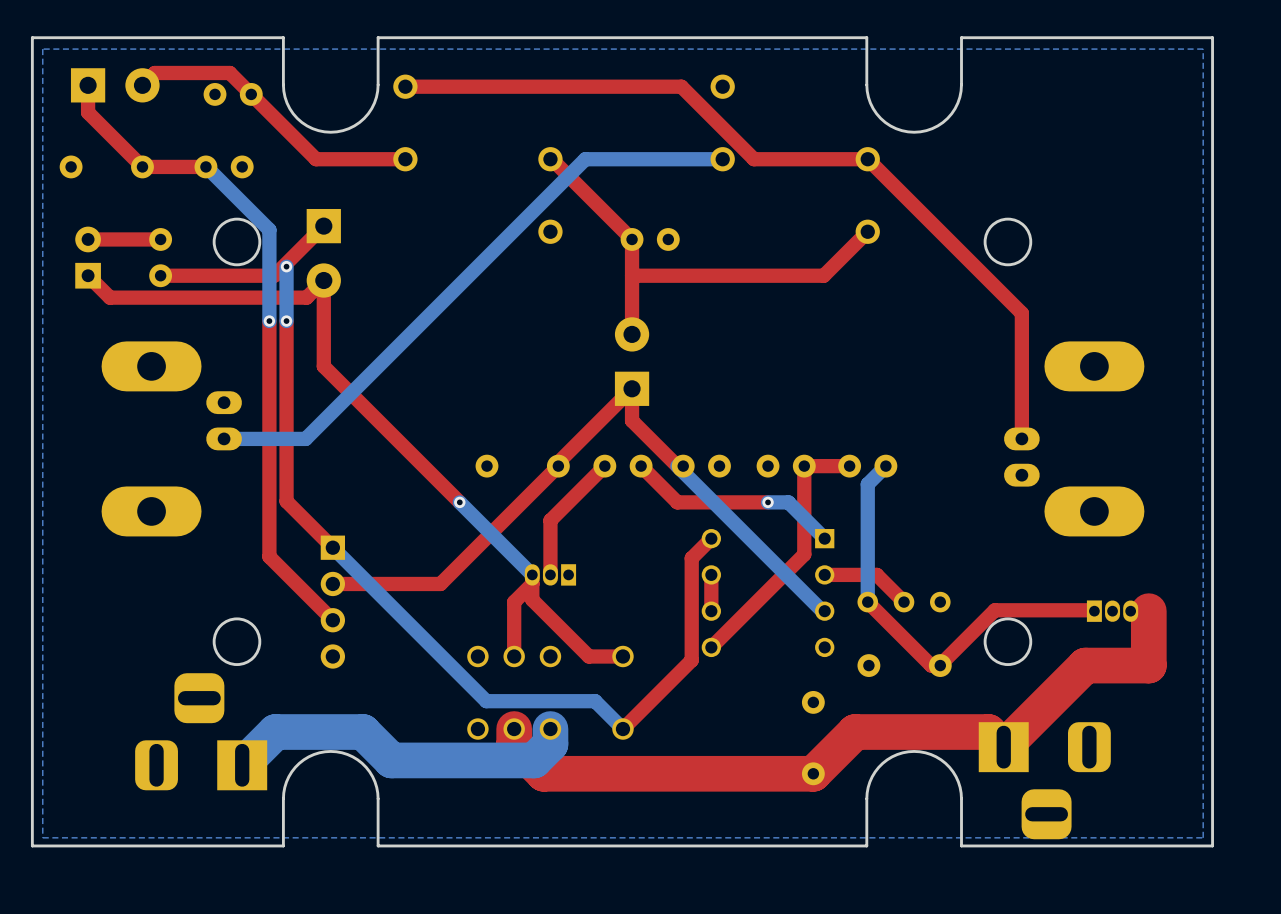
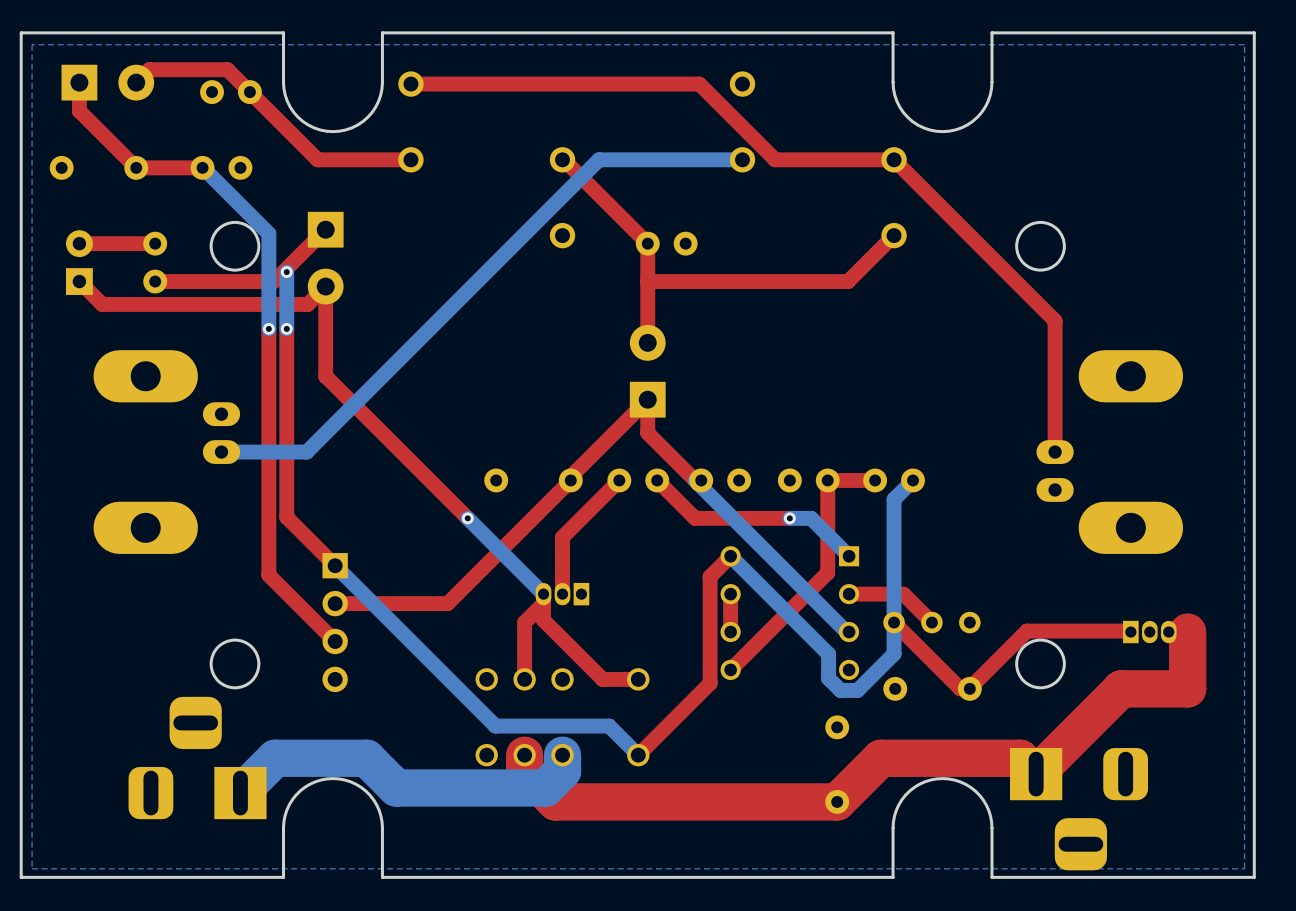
bottom track: none -> (730, 556) (828, 654) (828, 678) (840, 690) (857, 690) (894, 653) (894, 622)

